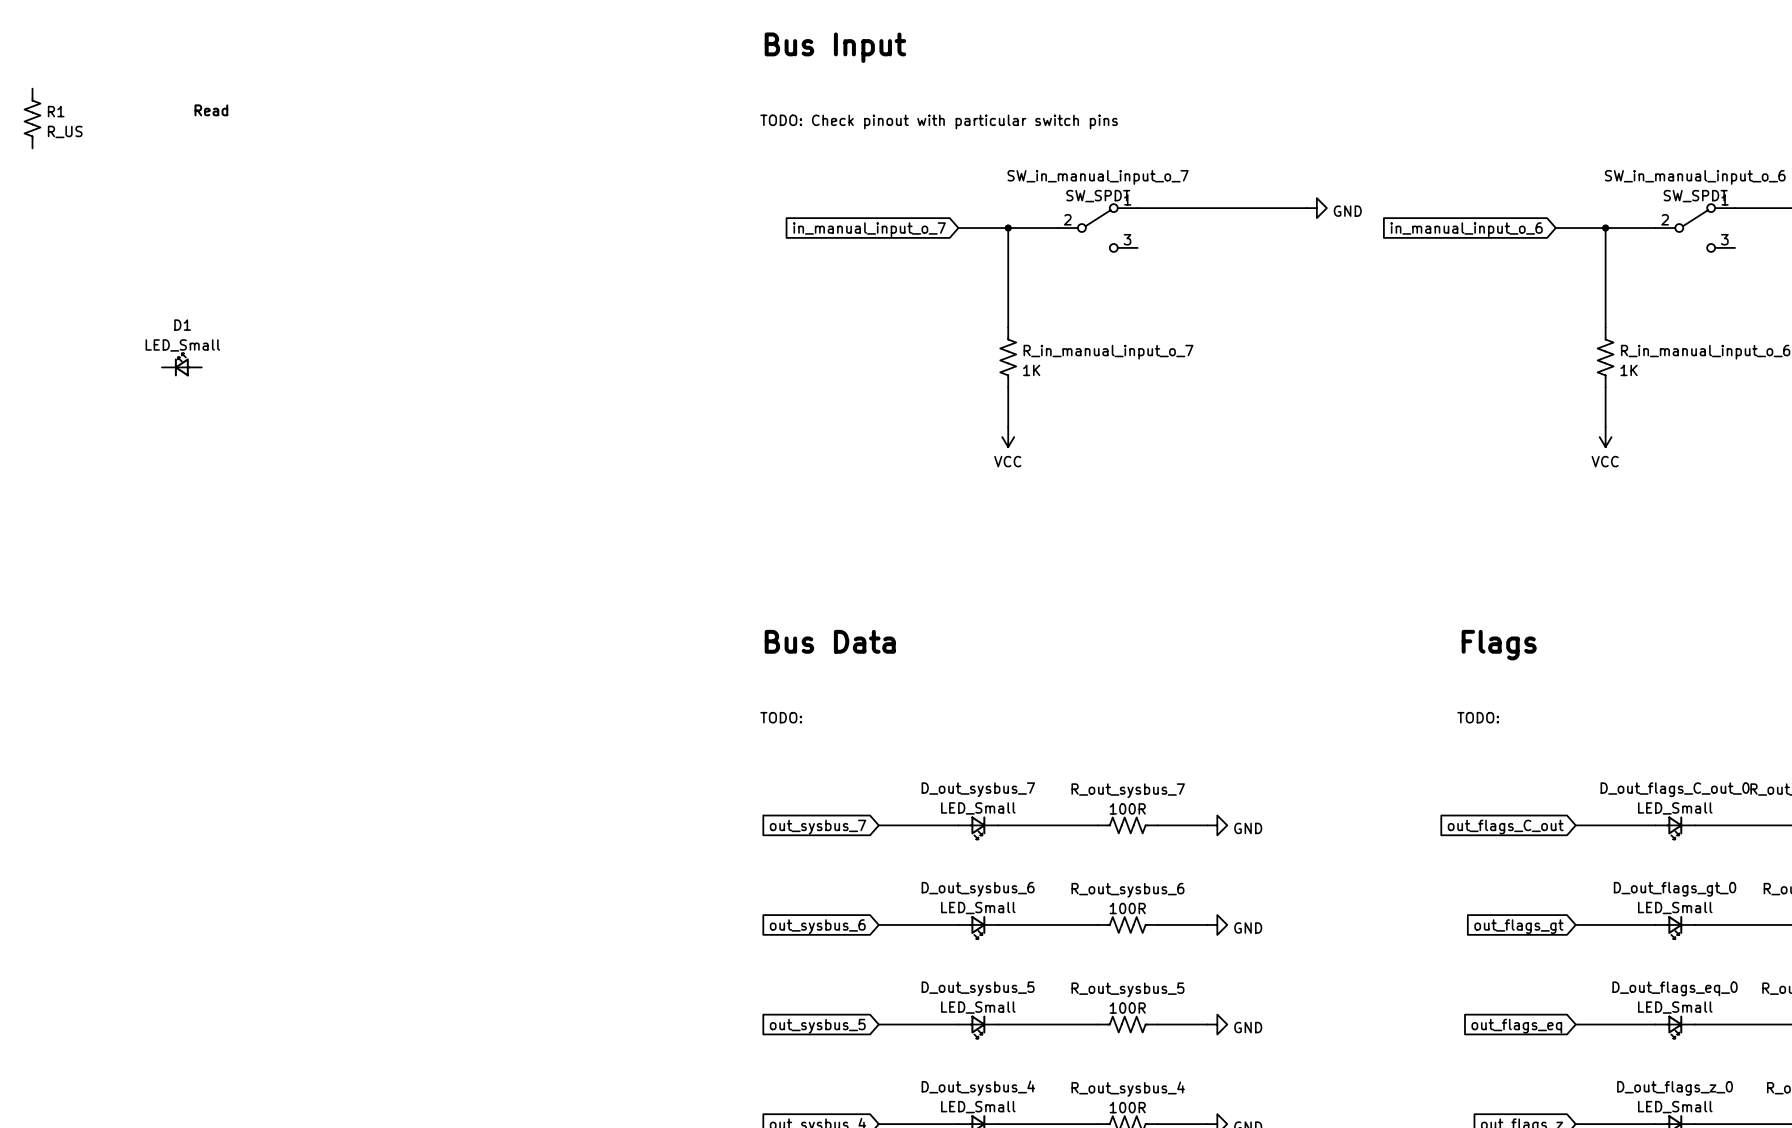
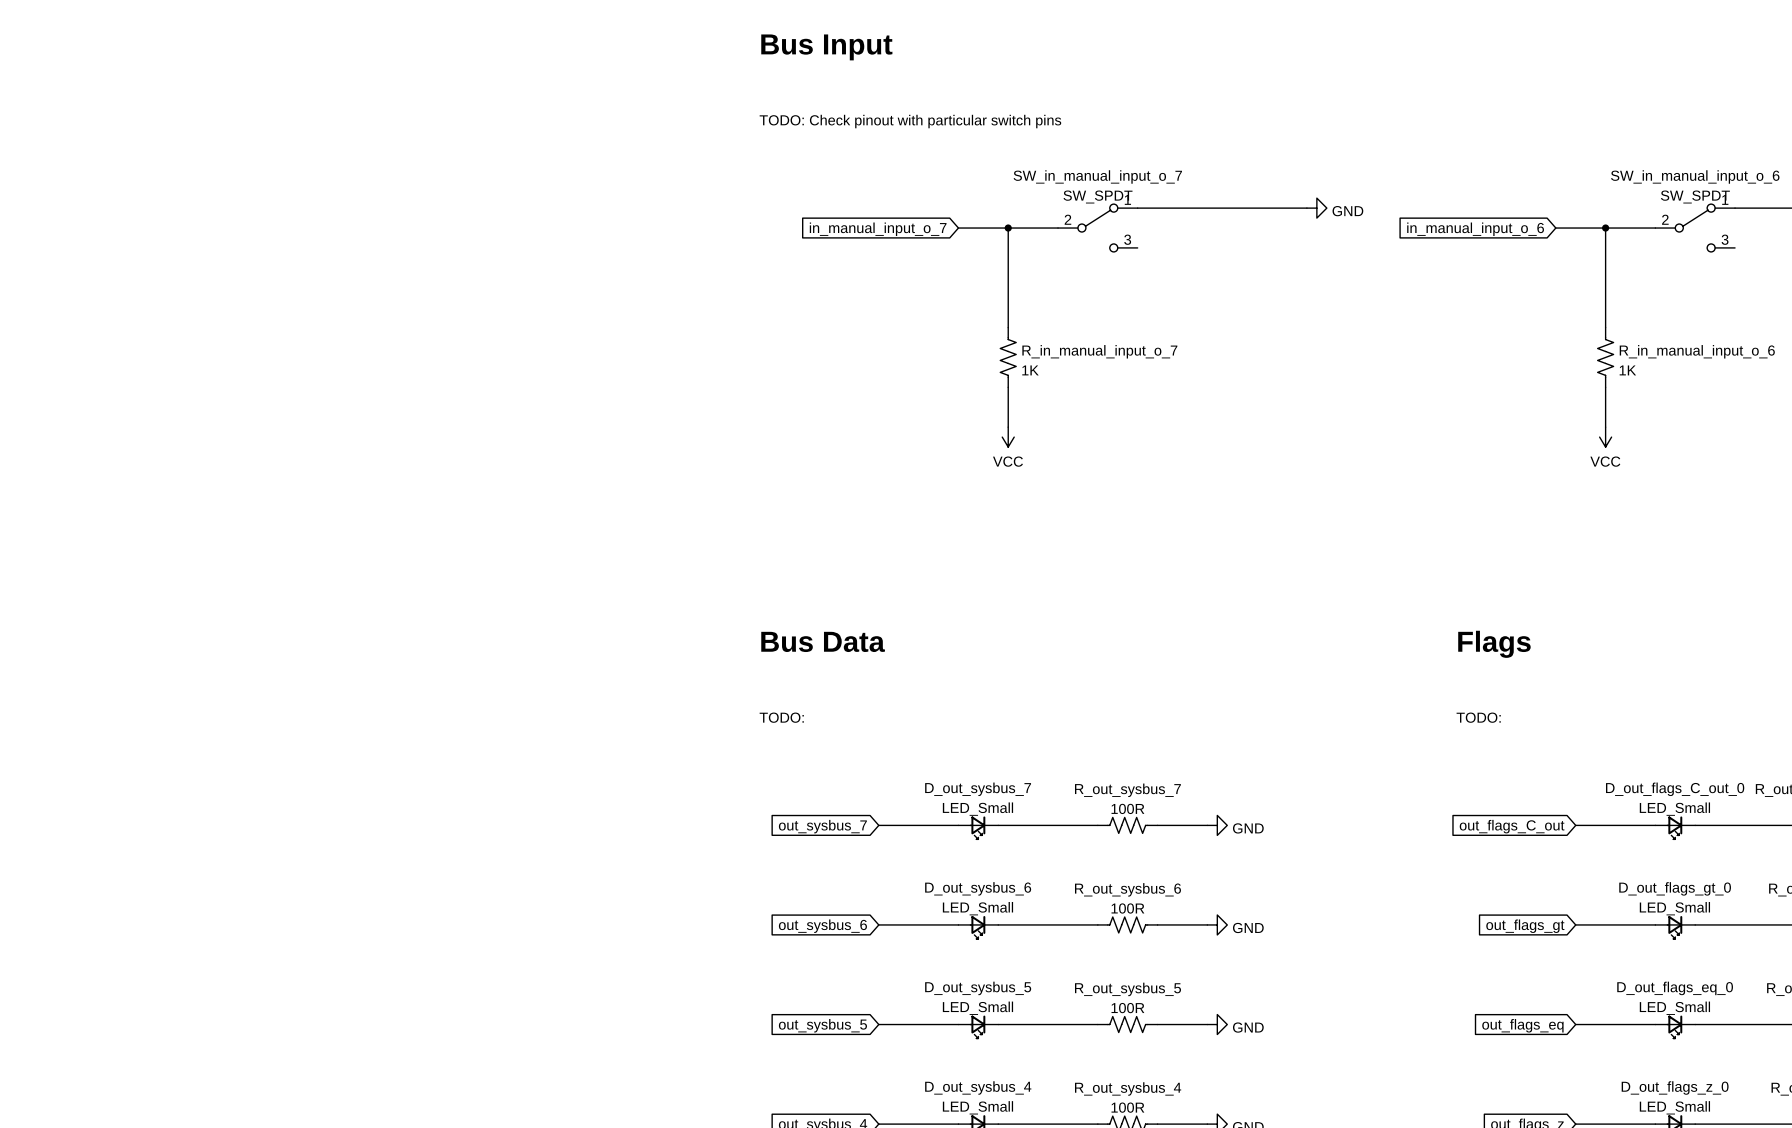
text: Read (211, 110) -> none
R1: R_US (32, 118) -> none
D1: LED_Small (181, 364) -> none

